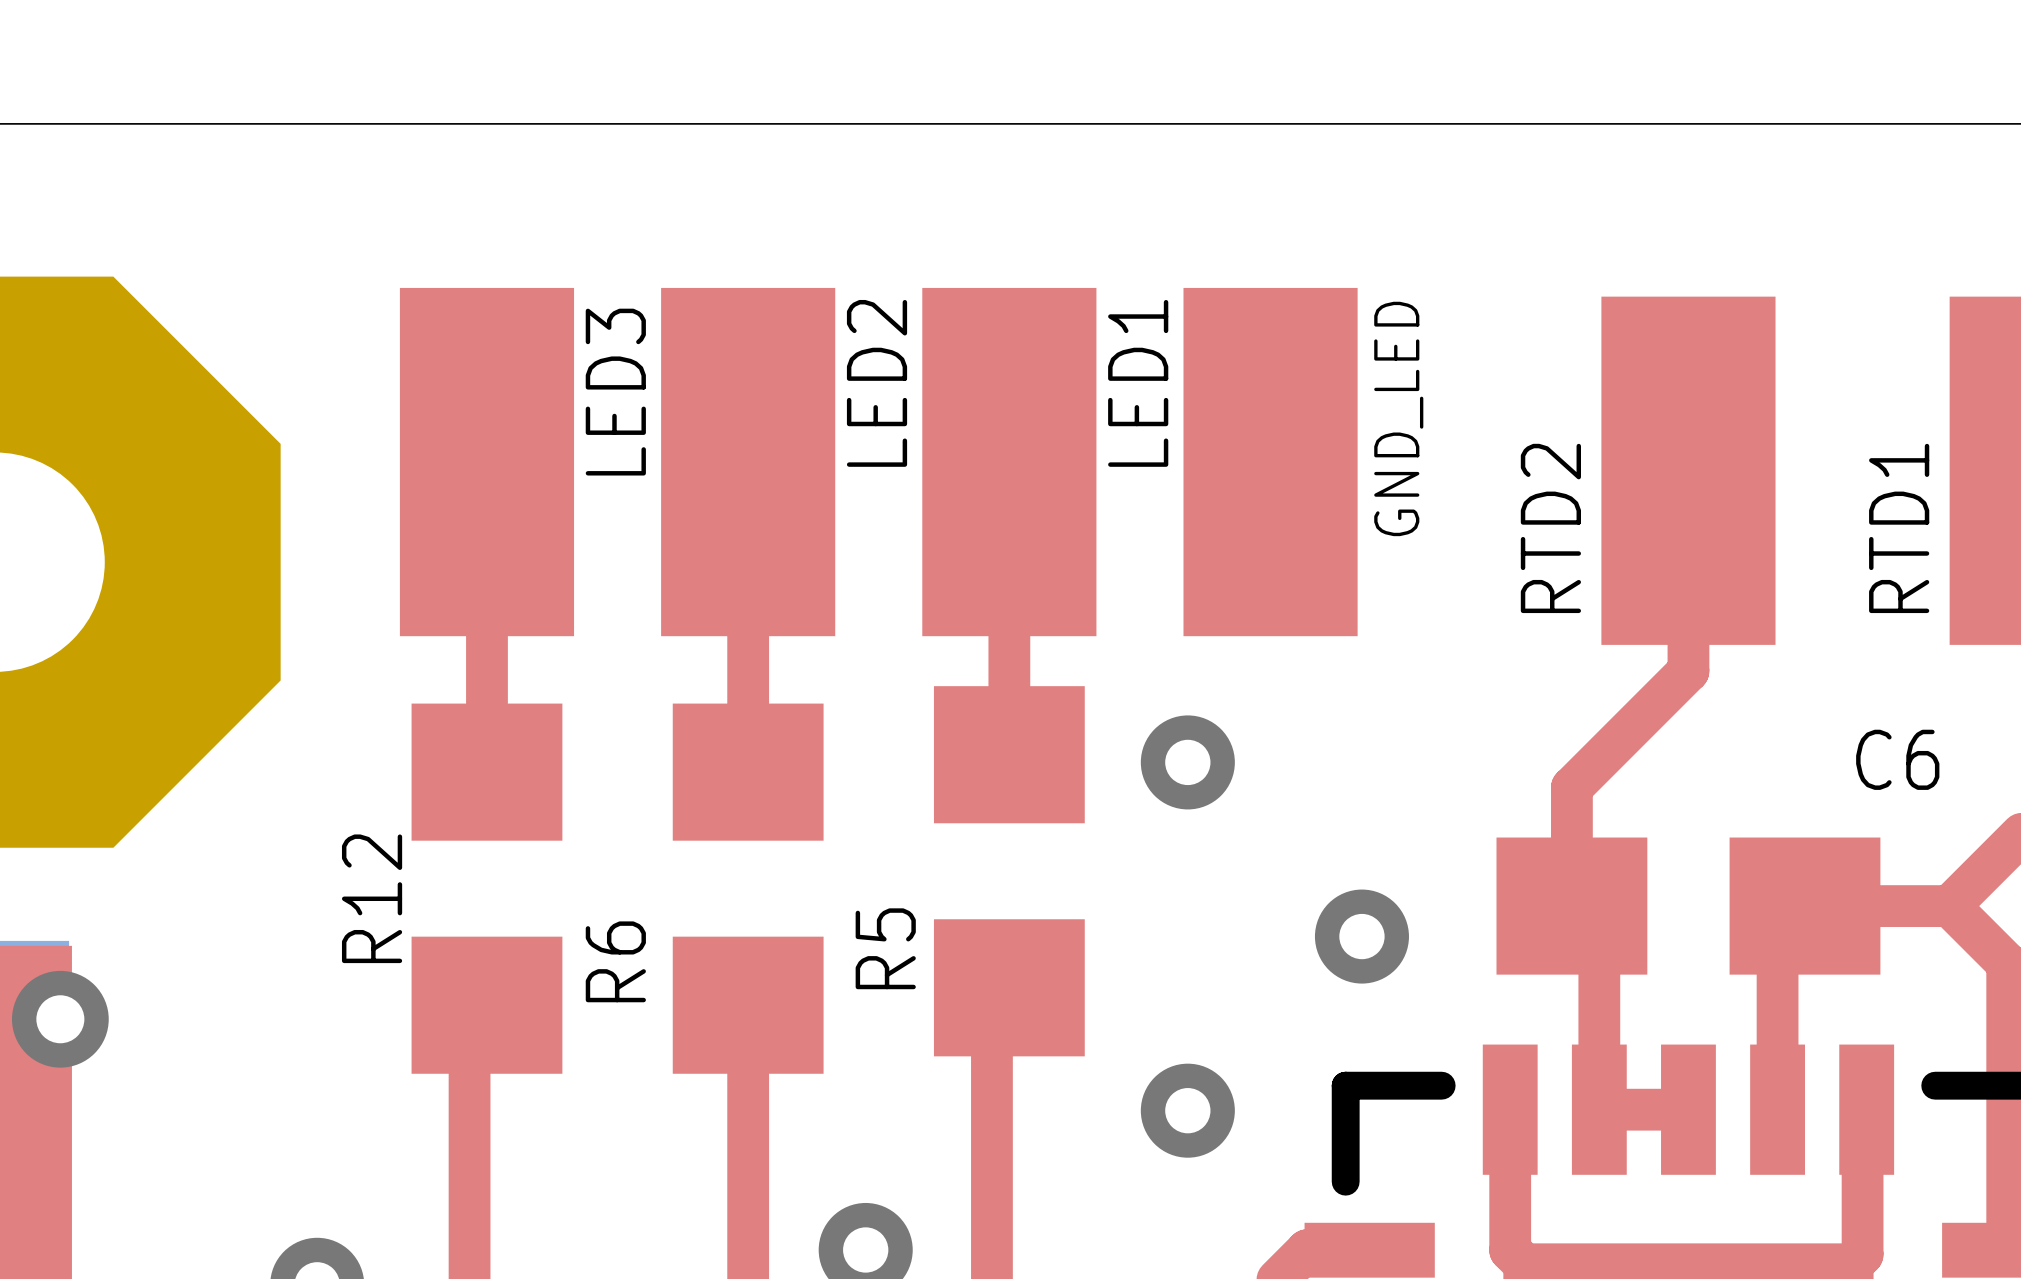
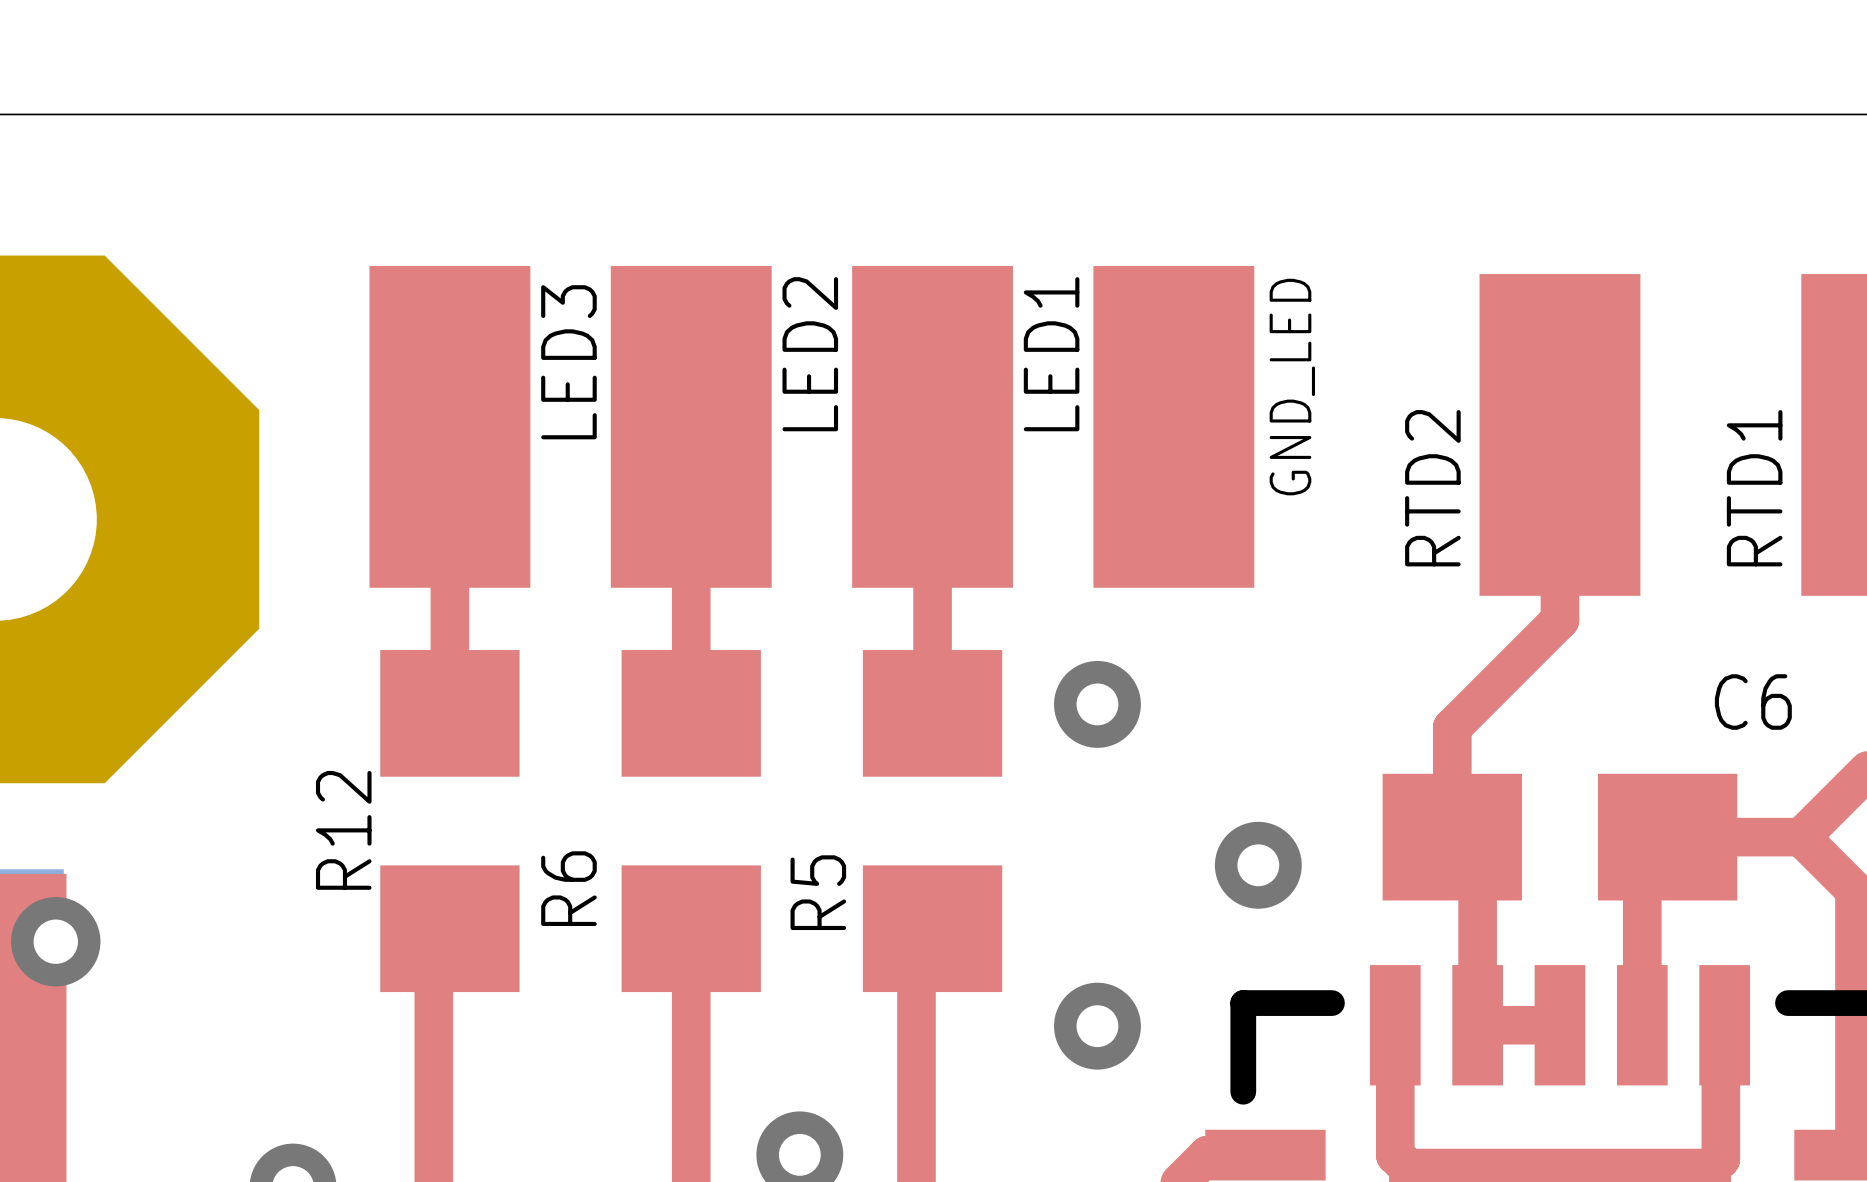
R5 position: (1009, 871) -> (932, 821)

